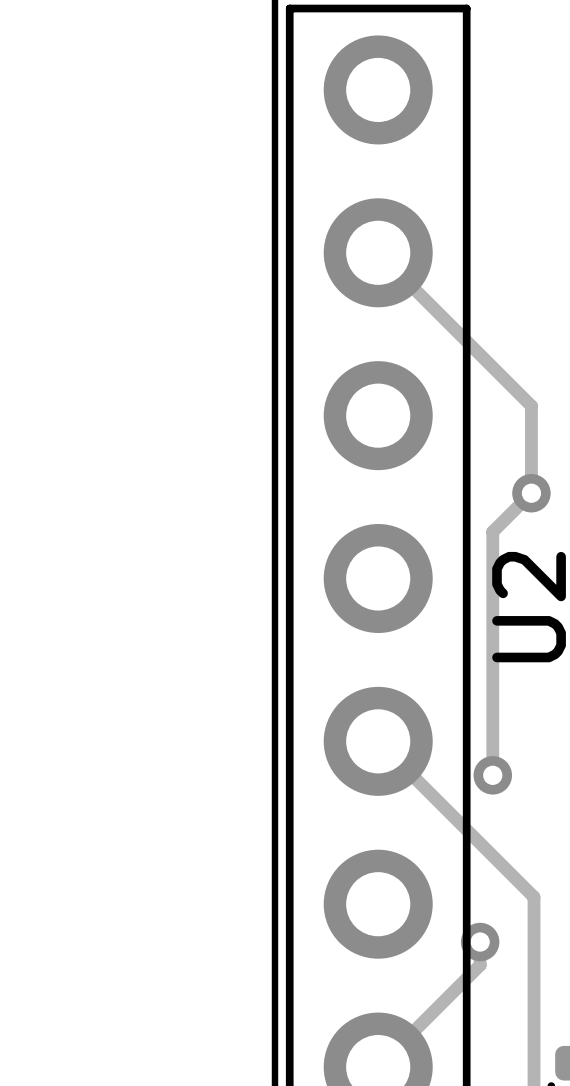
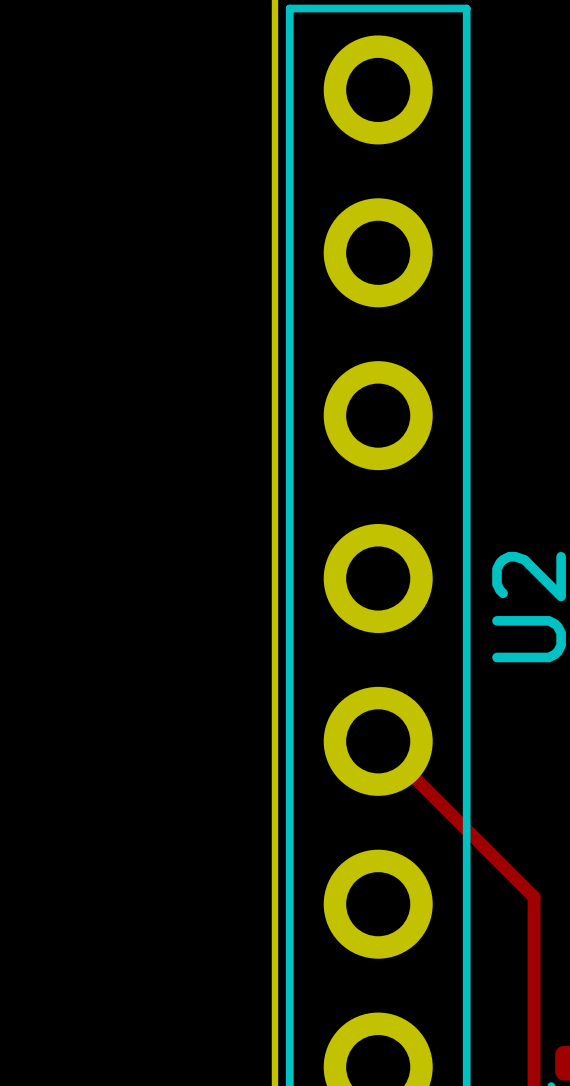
track: (378, 252) (531, 406) (531, 493) (492, 531) (492, 775) -> none
via: (531, 493) -> none
via: (492, 775) -> none
track: (480, 942) (480, 965) (378, 1067) -> none
via: (480, 942) -> none

